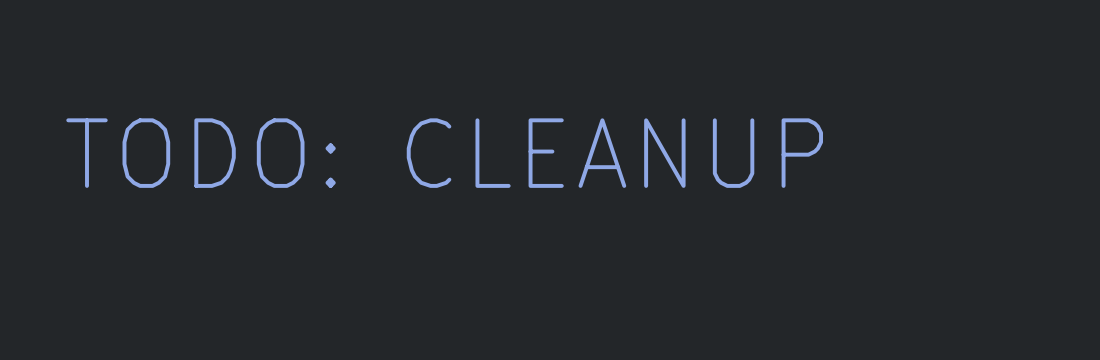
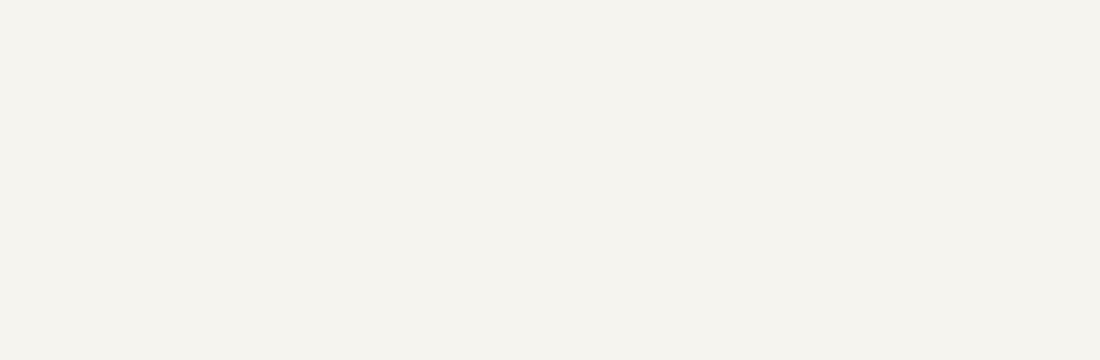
text: TODO: CLEANUP (444, 153) -> none

